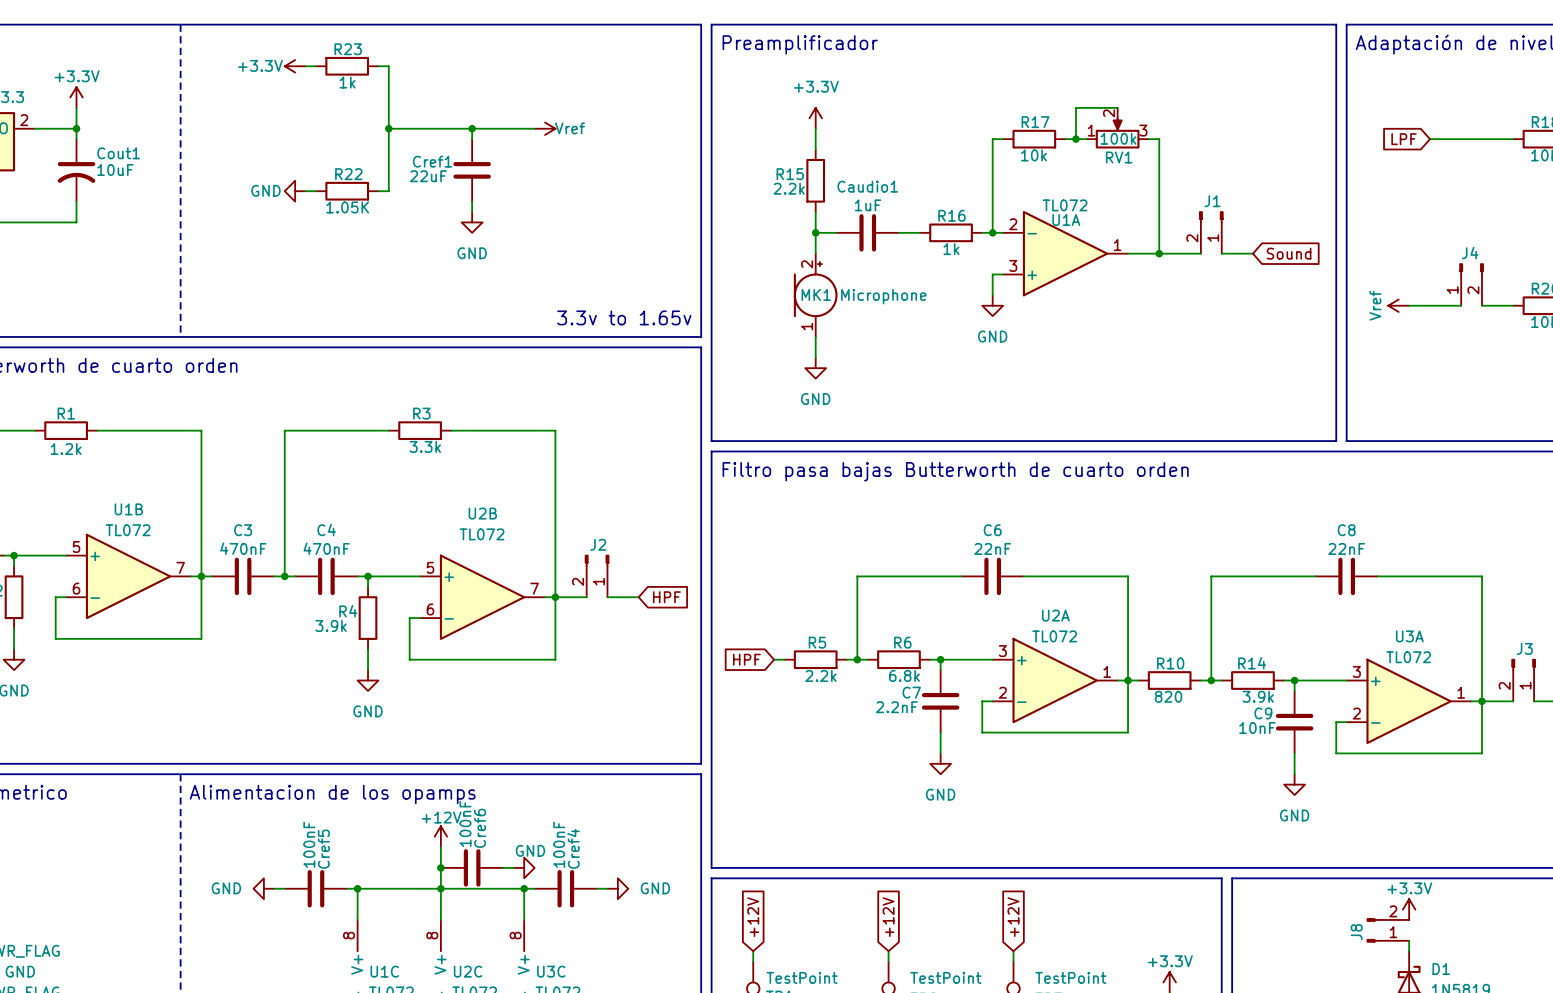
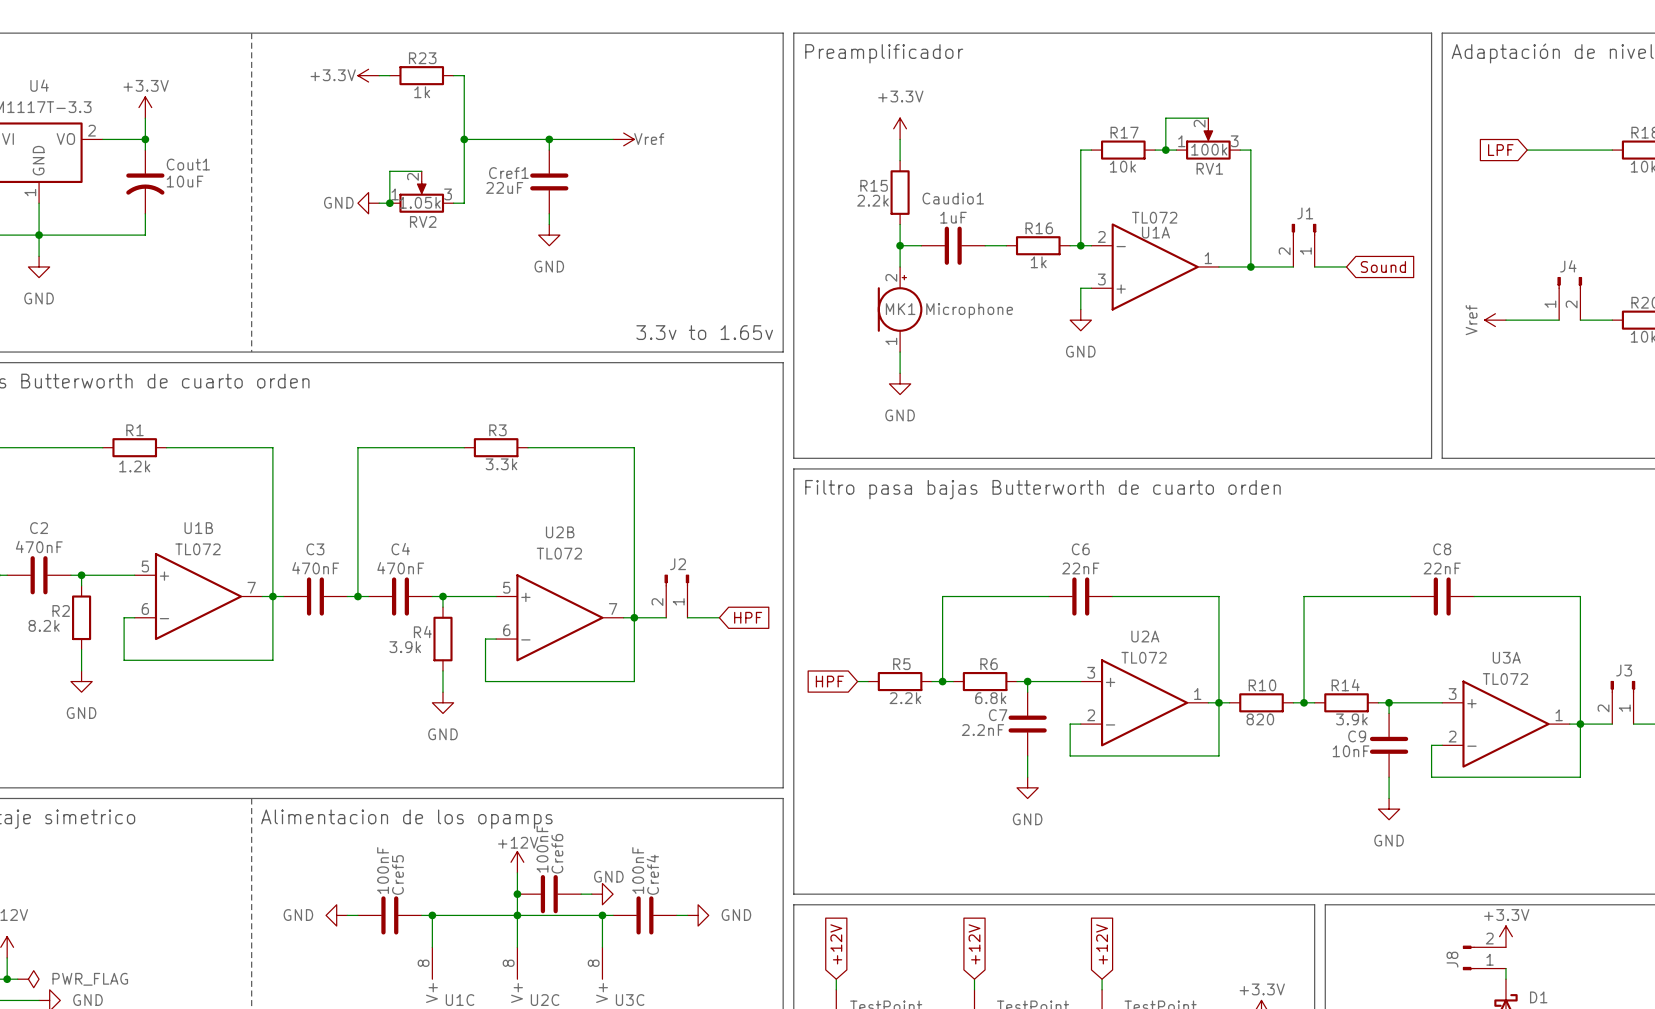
wire: none -> (421, 171) (389, 171) (389, 203)
RV2: none -> 1.05k (421, 192)
junction: none -> (389, 203)
R22: 1.05K (347, 191) -> none

